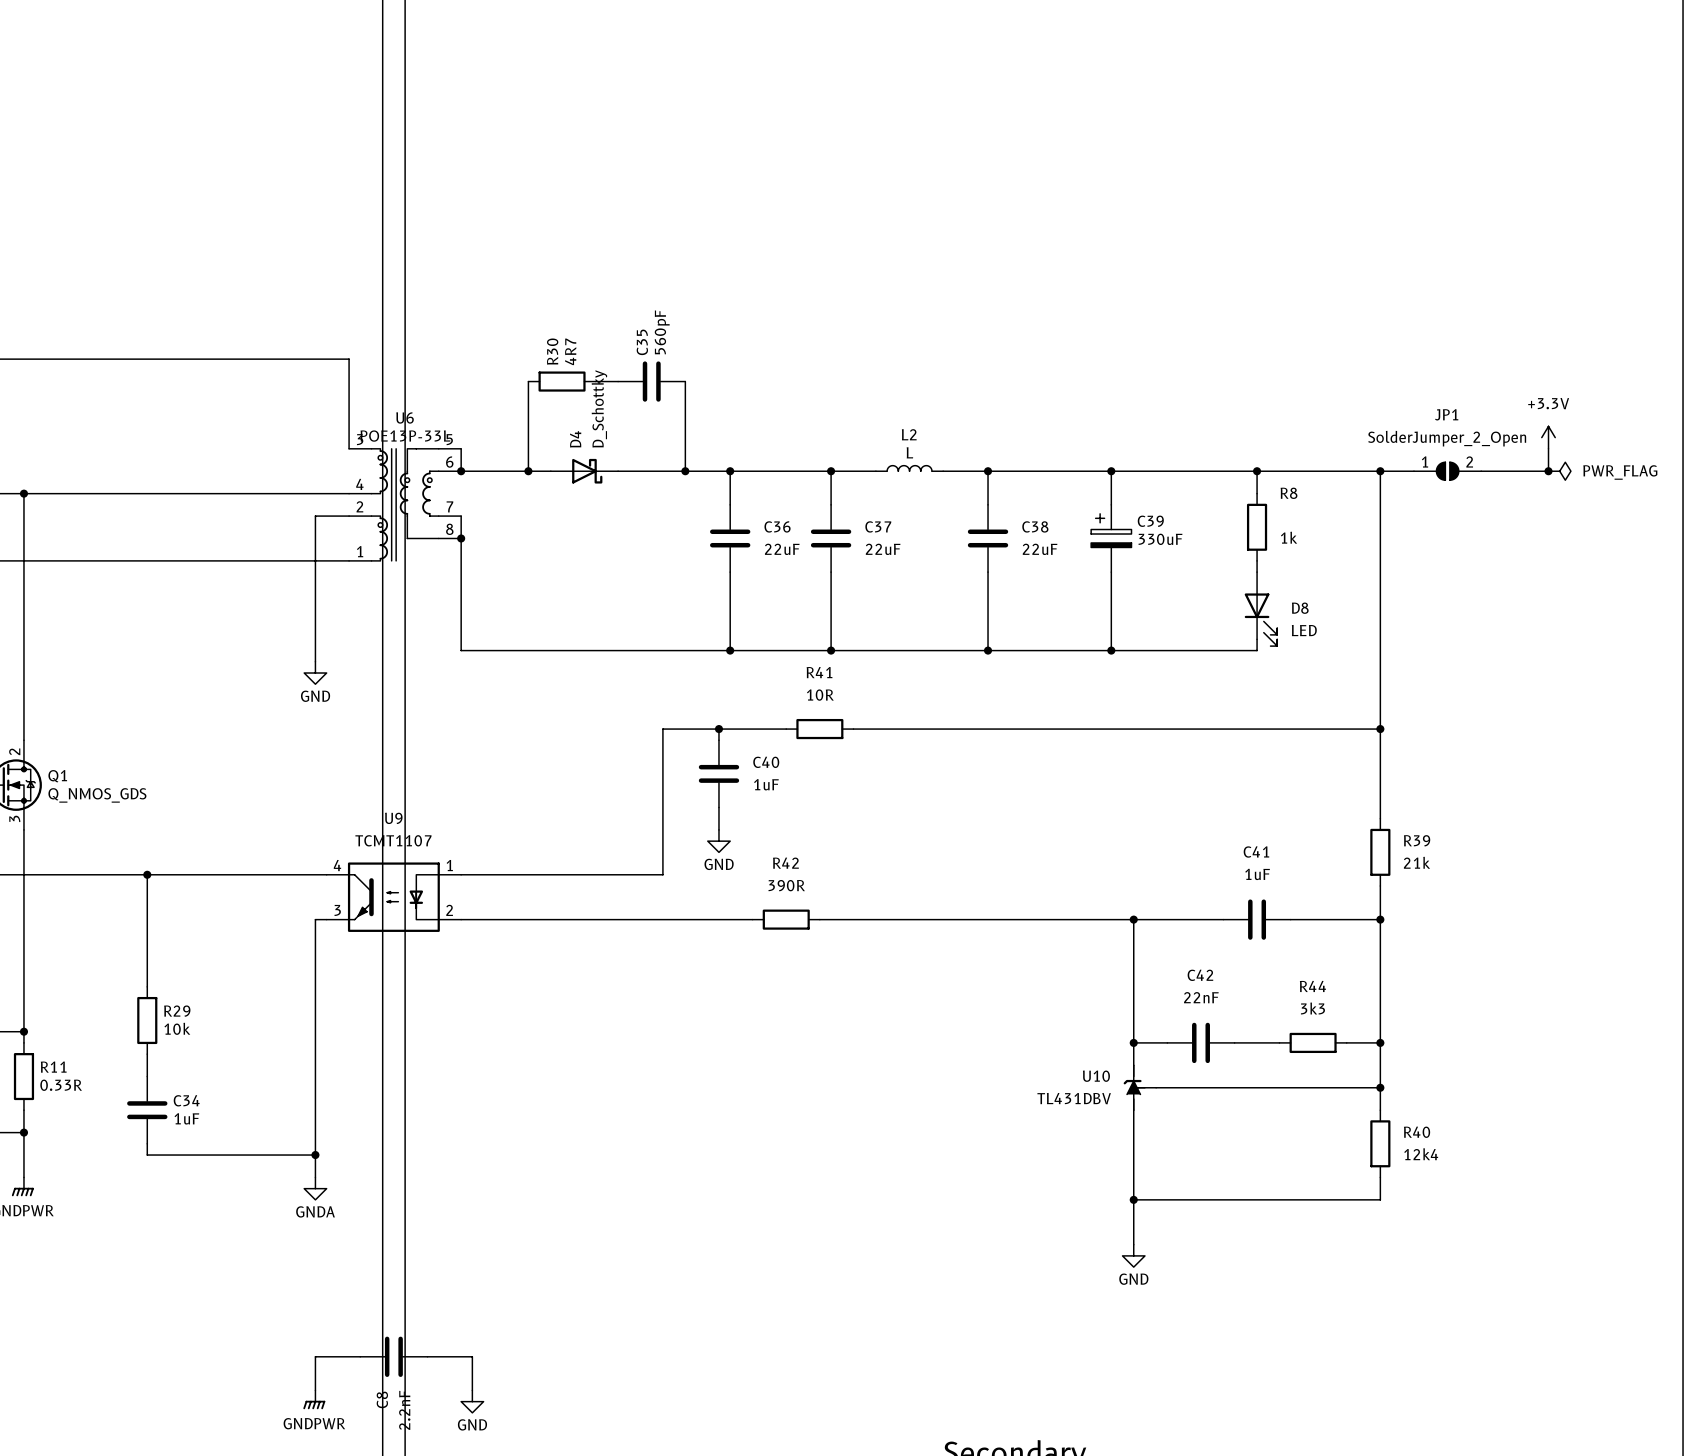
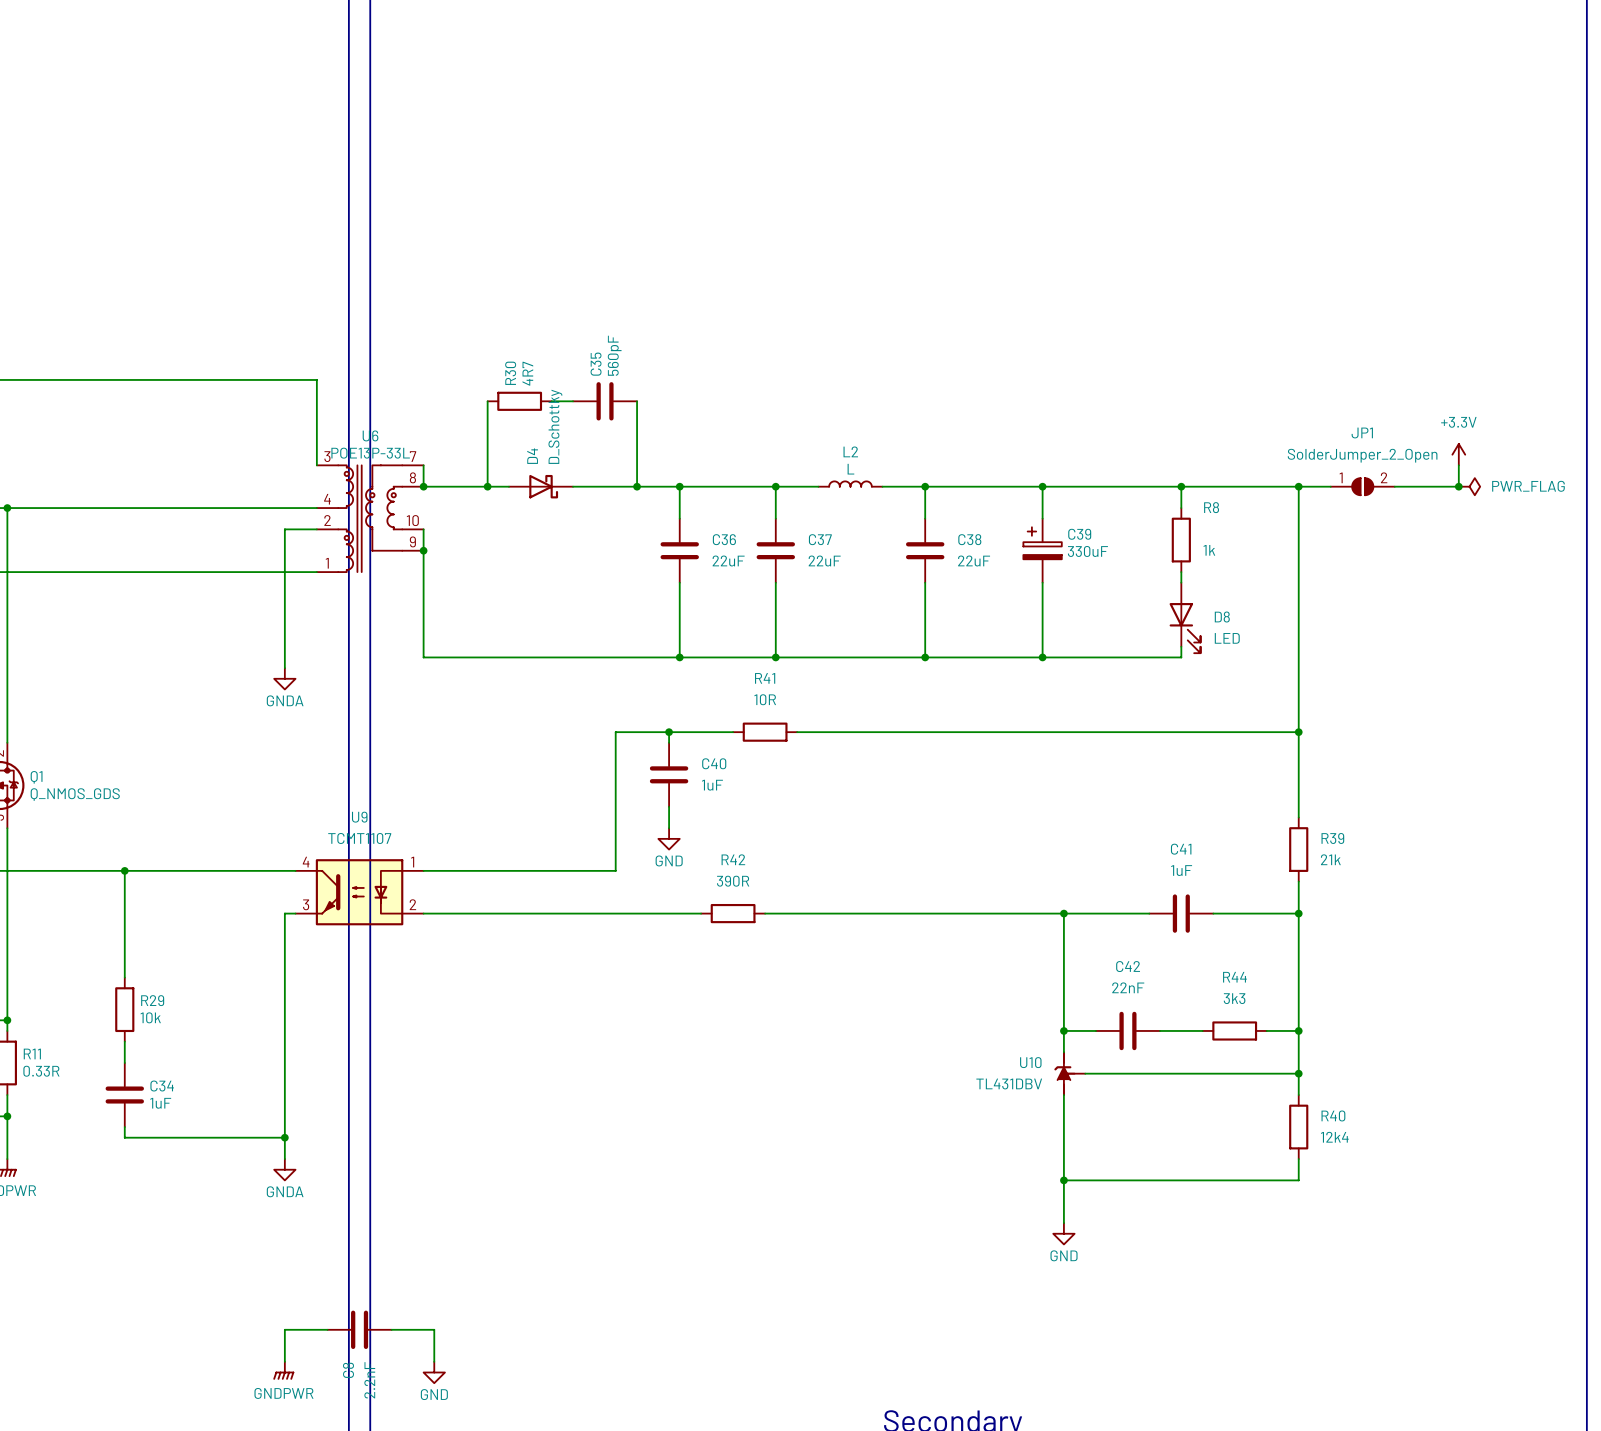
U6 pin number: 5 (449, 439) -> 7 (413, 456)
U6 pin number: 6 (449, 462) -> 8 (412, 477)
U6 pin number: 7 (449, 506) -> 10 (412, 520)
U6 pin number: 8 (449, 529) -> 9 (412, 541)
power symbol: GND (315, 673) -> GNDA (284, 678)

